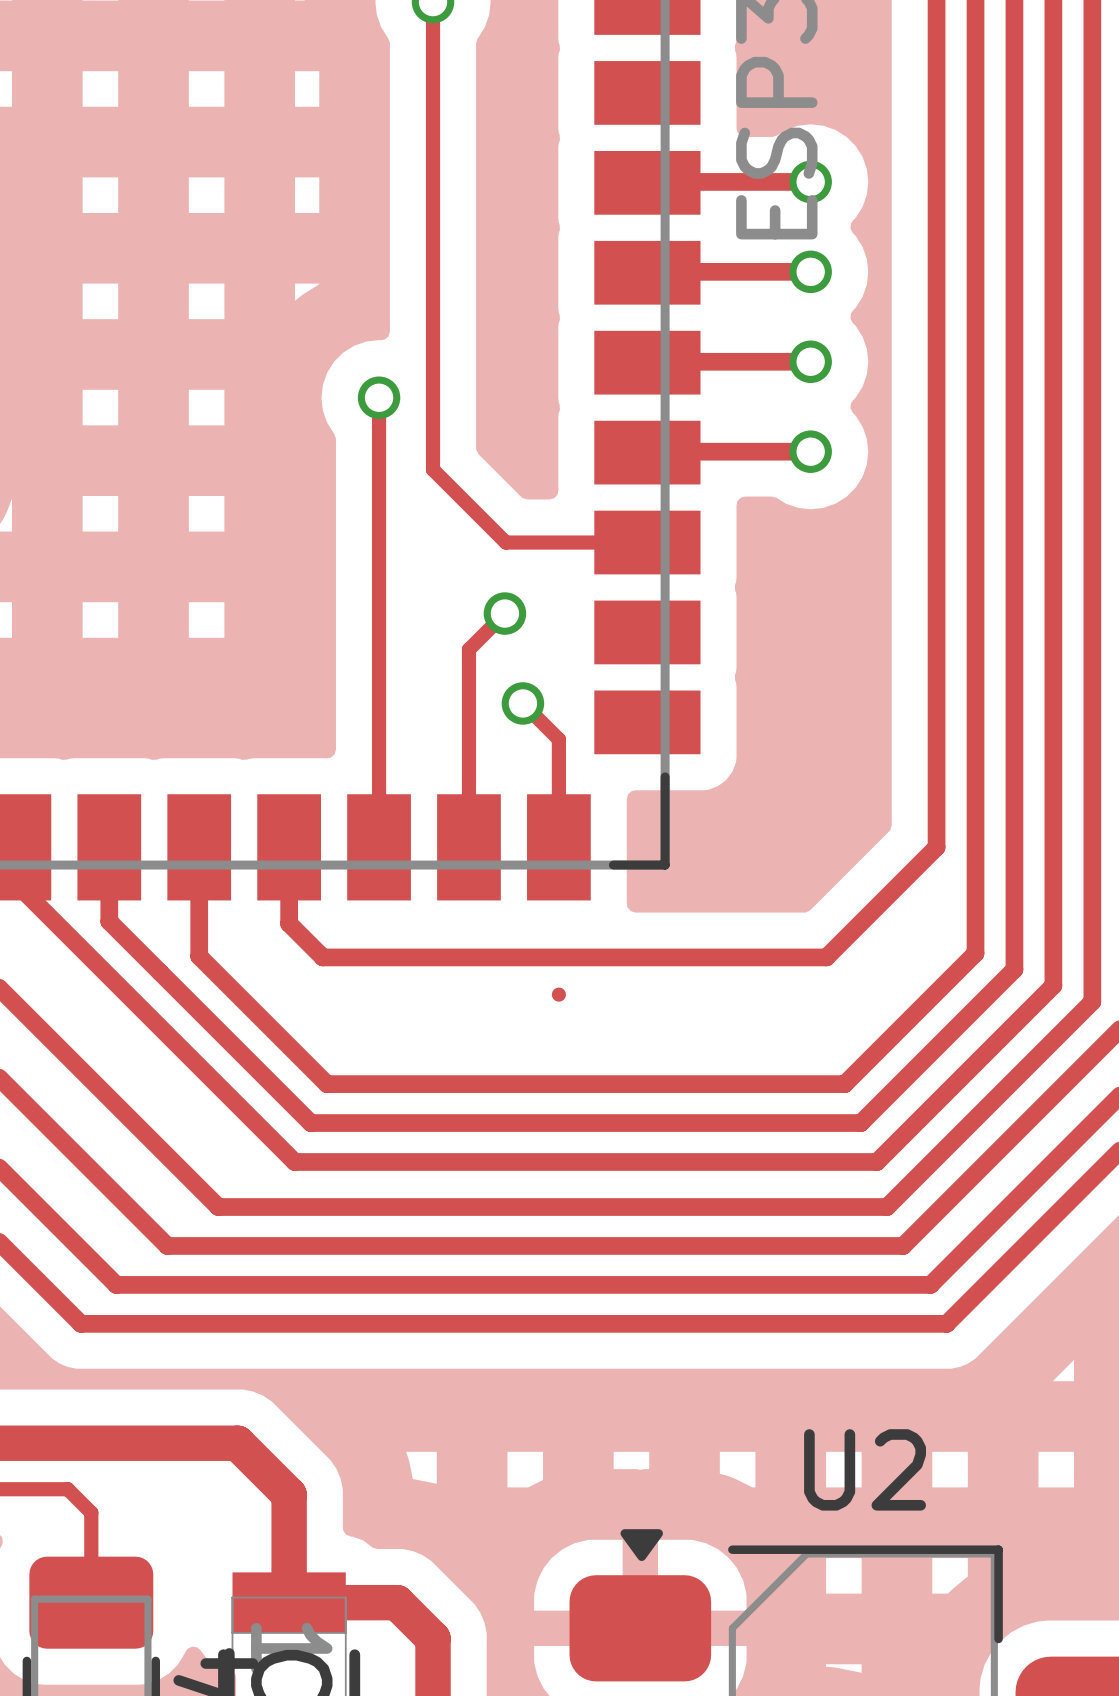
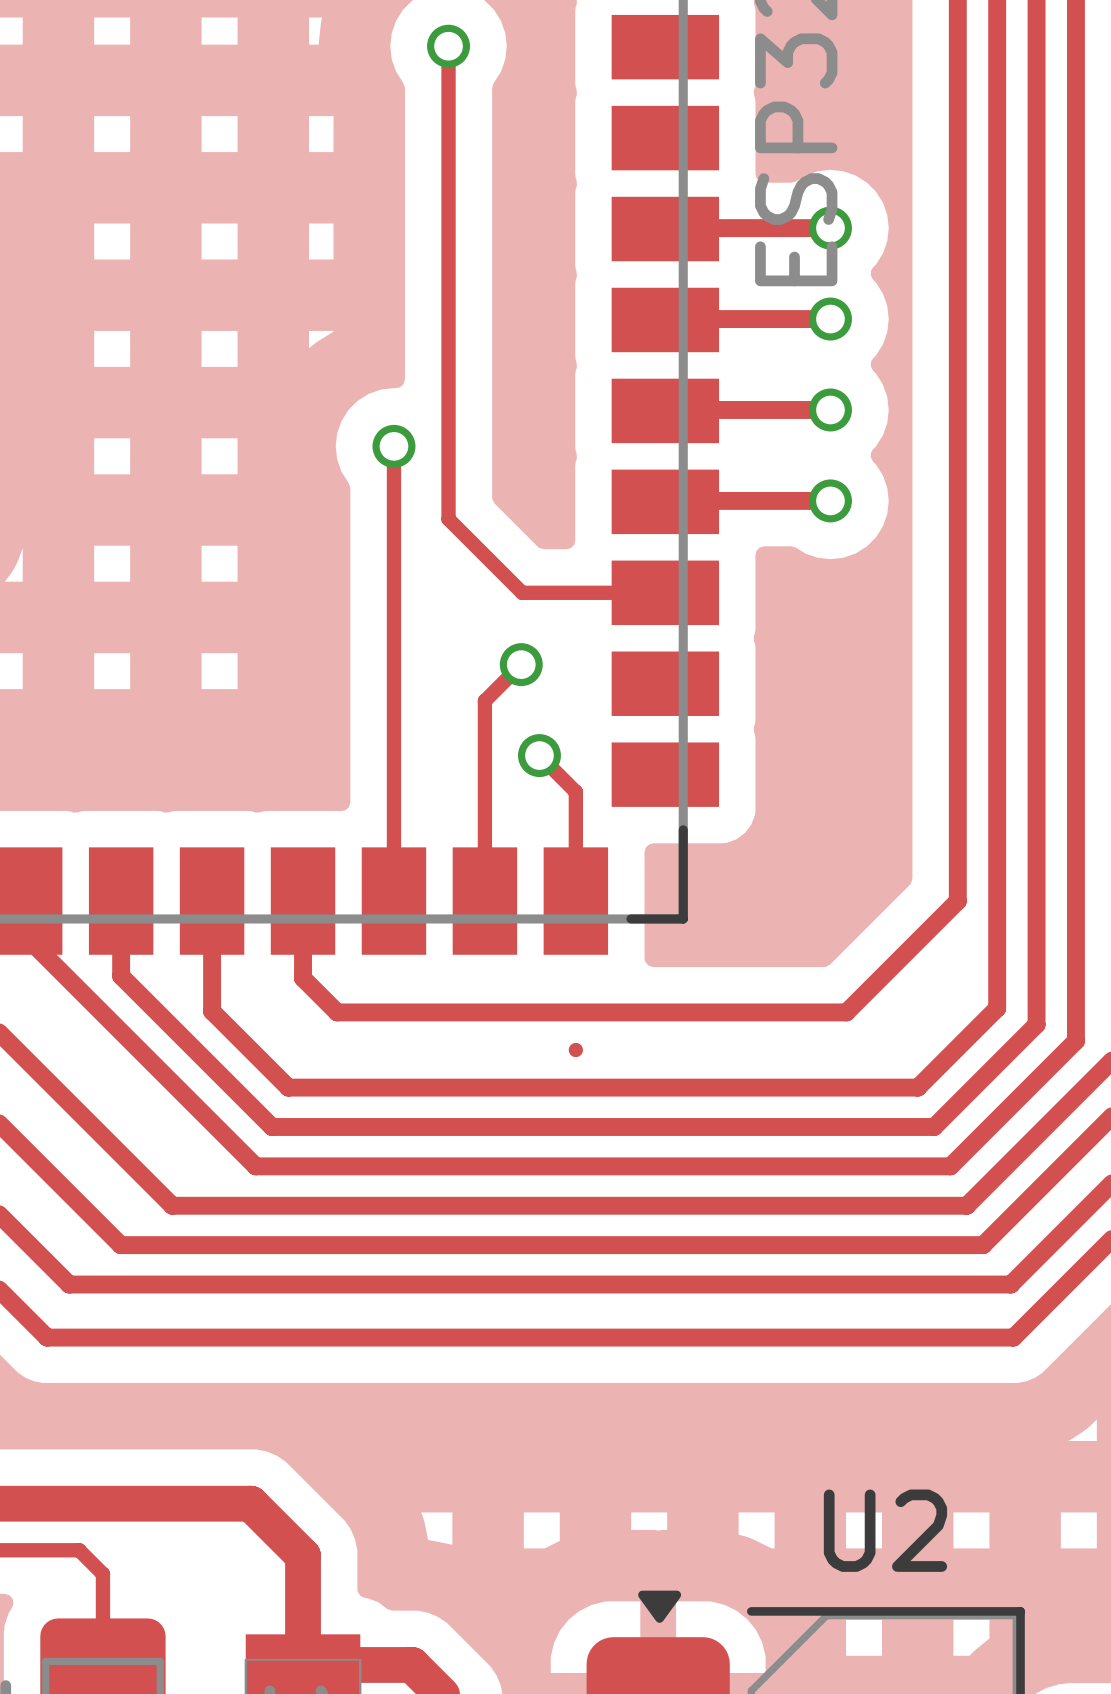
track: (274, 1031) (326, 1084) (844, 1084) (897, 1031) -> (288, 1087) (917, 1087)
track: (258, 1070) (310, 1123) (860, 1123) (913, 1070) -> (272, 1126) (934, 1126)
track: (242, 1109) (294, 1161) (877, 1161) (929, 1109) -> (255, 1166) (950, 1166)
track: (159, 1148) (218, 1207) (887, 1207) (945, 1148) -> (172, 1205) (966, 1205)
track: (108, 1187) (167, 1245) (903, 1245) (961, 1187) -> (120, 1245) (983, 1245)
track: (57, 1226) (116, 1284) (930, 1284) (989, 1226) -> (69, 1284) (1010, 1284)
track: (36, 1278) (80, 1323) (946, 1323) (991, 1278) -> (47, 1337) (1013, 1337)

